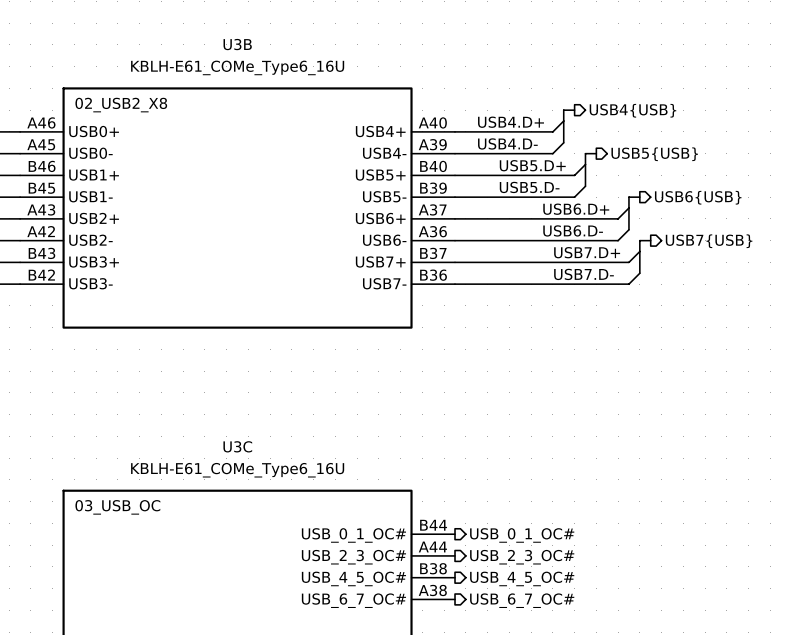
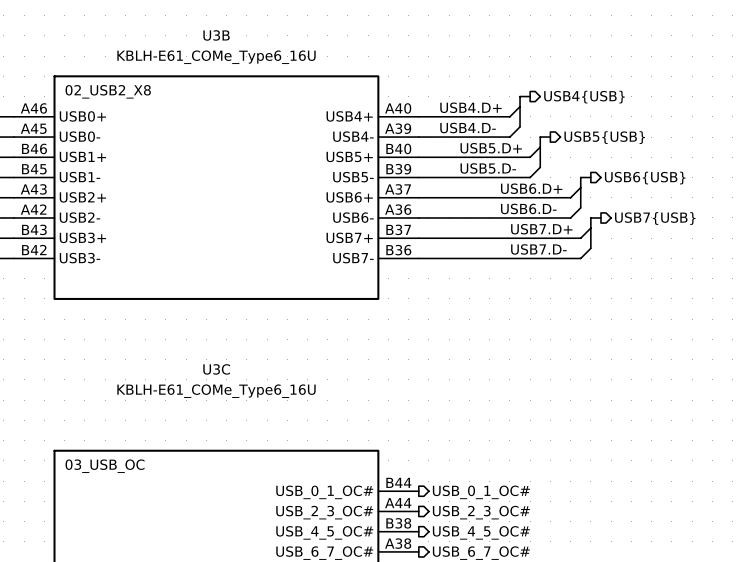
U3C name position: U3C (237, 446) -> U3C (216, 369)
U3C value position: KBLH-E61_COMe_Type6_16U (237, 470) -> KBLH-E61_COMe_Type6_16U (216, 391)

